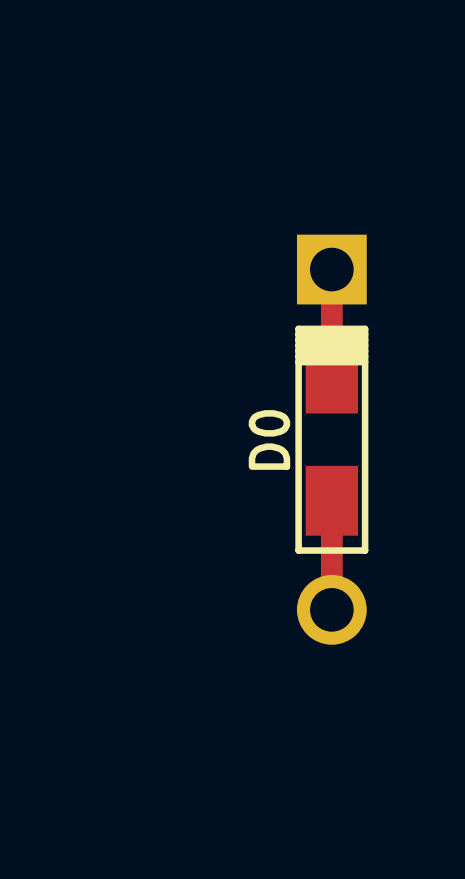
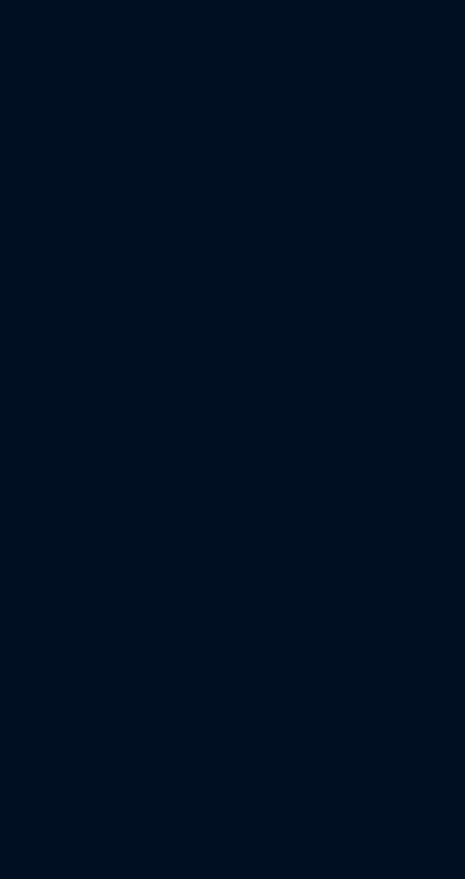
D0: (331, 439) -> none

